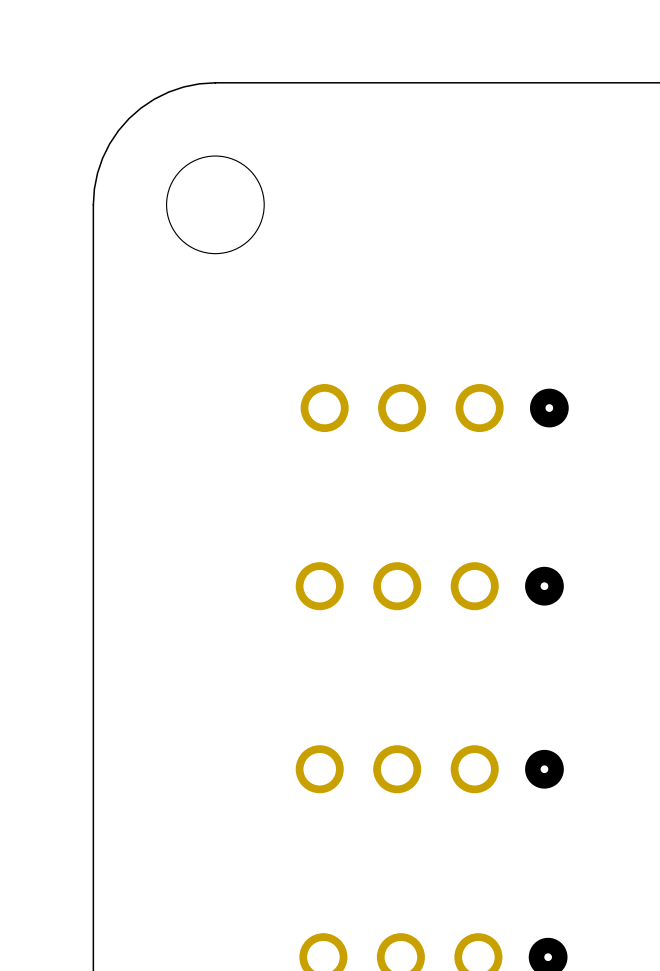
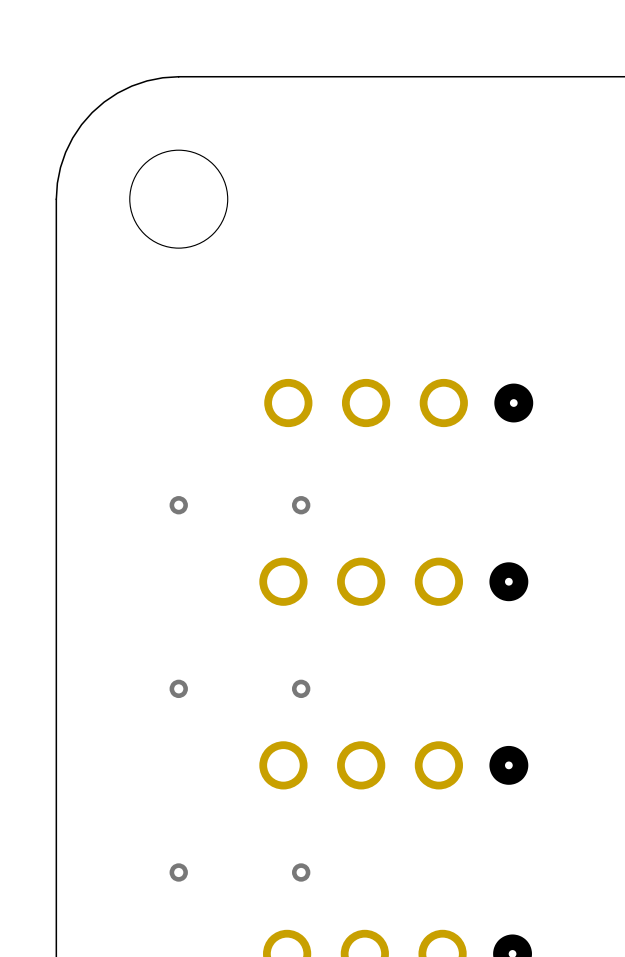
via: none -> (178, 505)
via: none -> (301, 505)
via: none -> (178, 688)
via: none -> (301, 688)
via: none -> (178, 872)
via: none -> (301, 872)

